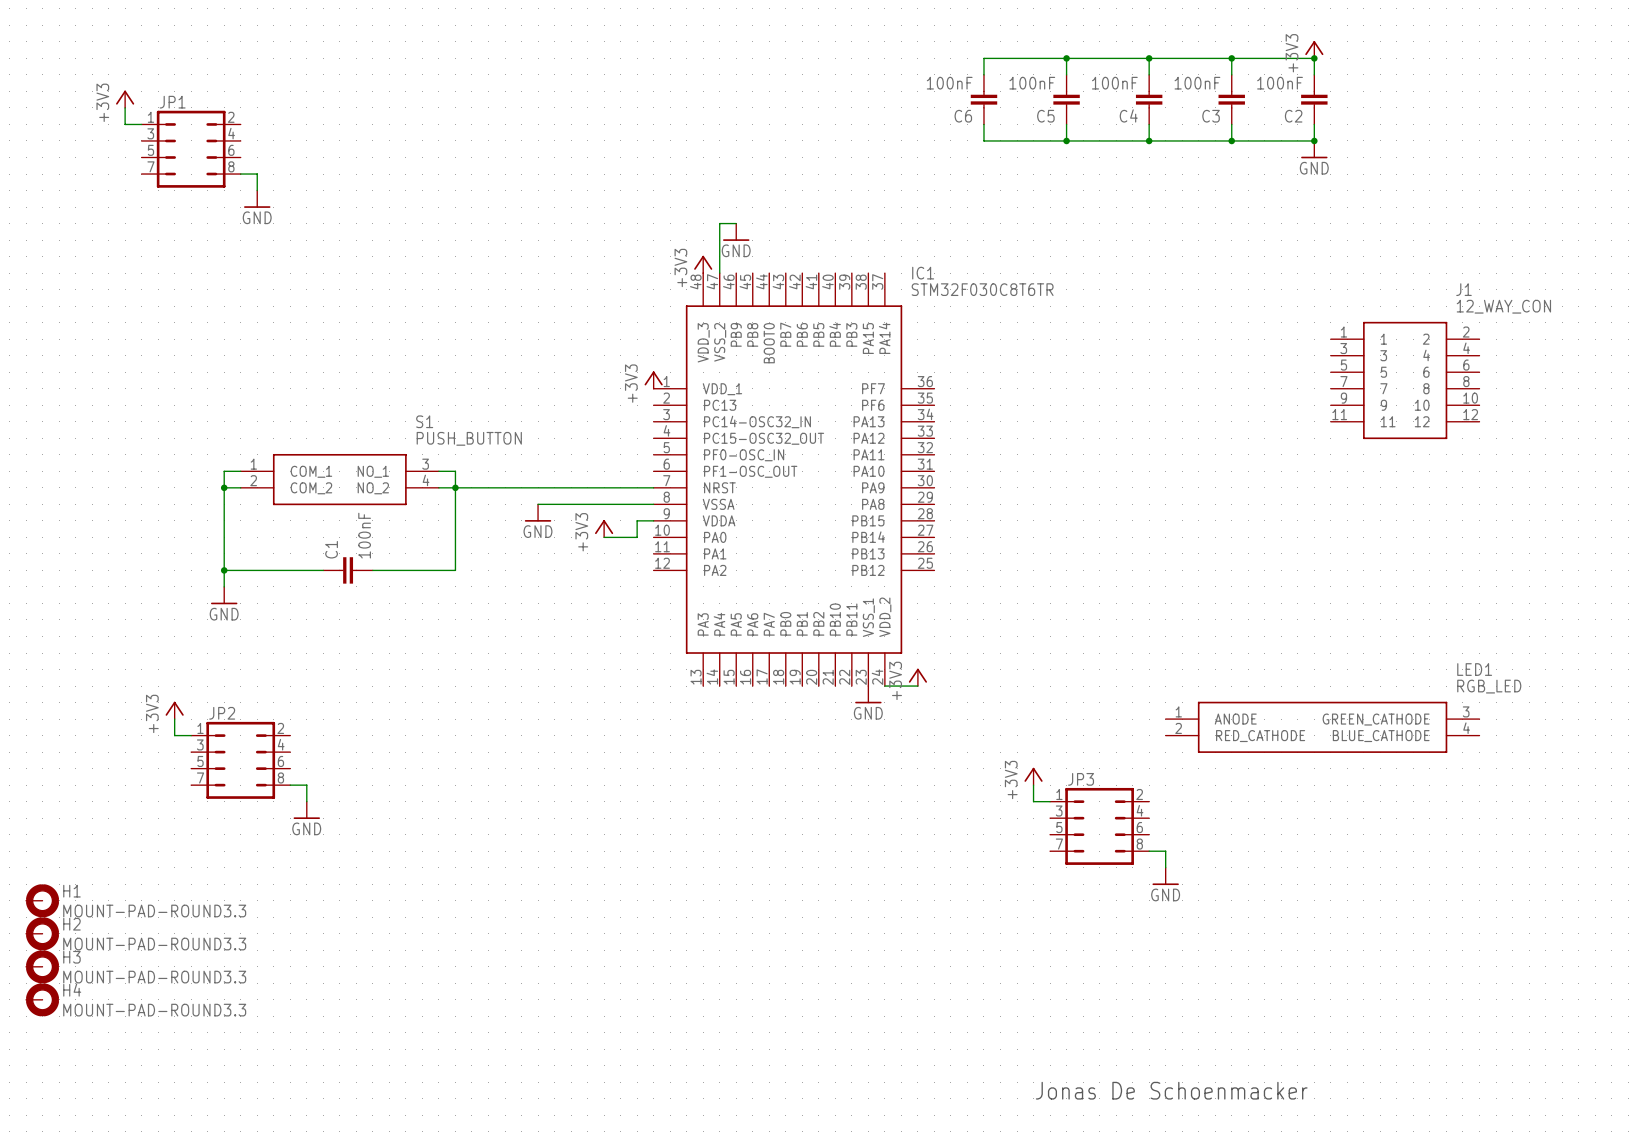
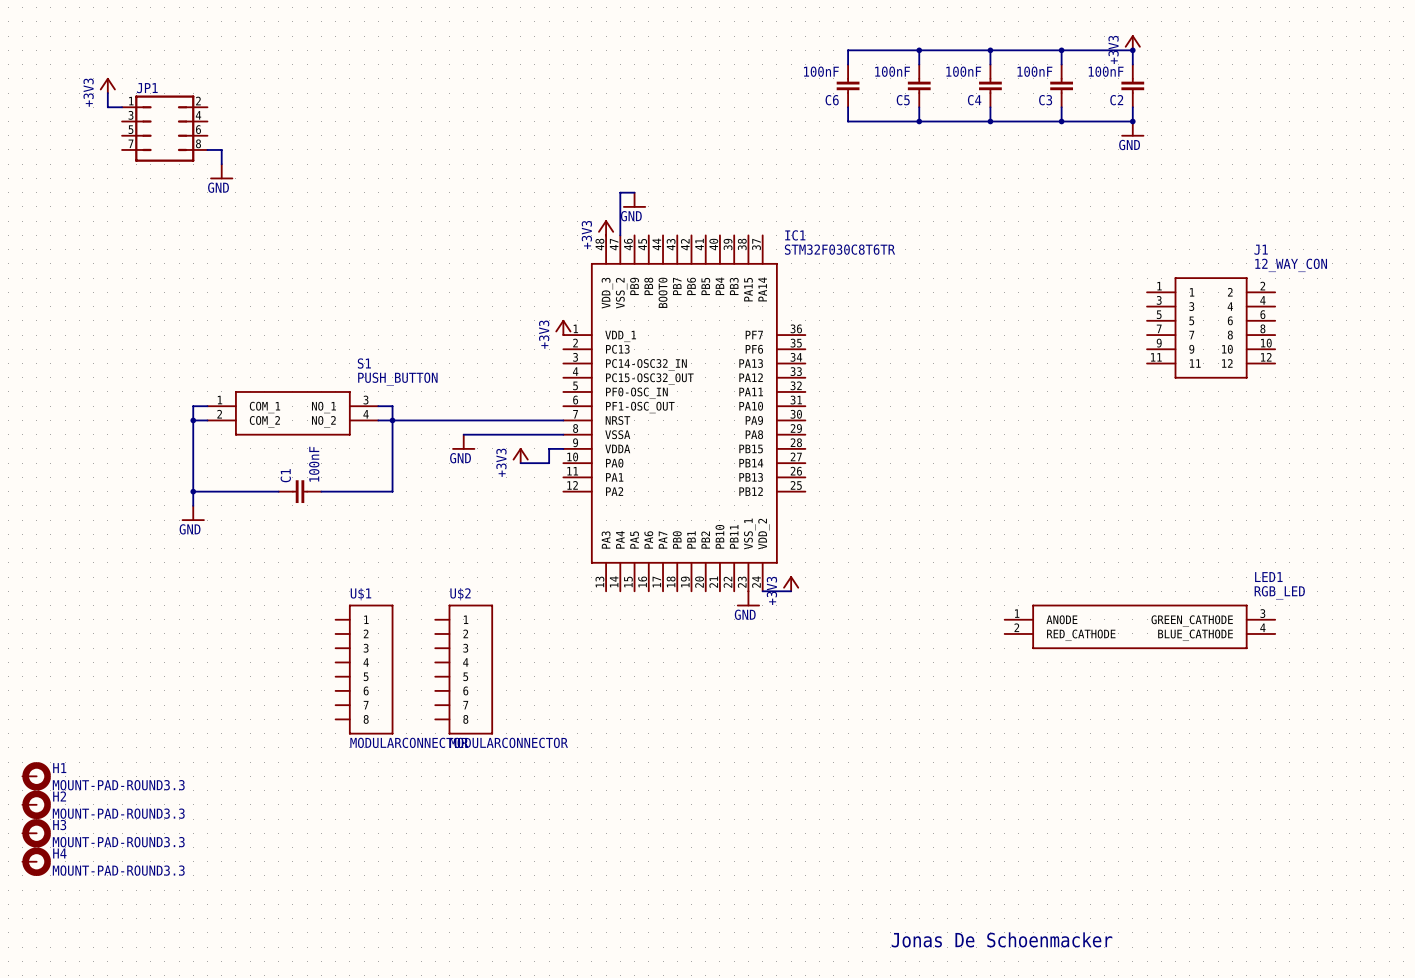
power symbol: +3V3 (174, 710) -> none
wire: (174, 719) (174, 735) (191, 735) -> none
JP2: (240, 760) -> none
U$1: none -> MODULARCONNECTOR (364, 669)
U$2: none -> MODULARCONNECTOR (464, 669)
power symbol: +3V3 (1033, 776) -> none
wire: (290, 785) (306, 785) (306, 801) -> none
wire: (1033, 785) (1033, 801) (1050, 801) -> none
power symbol: GND (306, 810) -> none
JP3: (1099, 826) -> none
wire: (1149, 851) (1165, 851) (1165, 867) -> none
power symbol: GND (1165, 876) -> none

